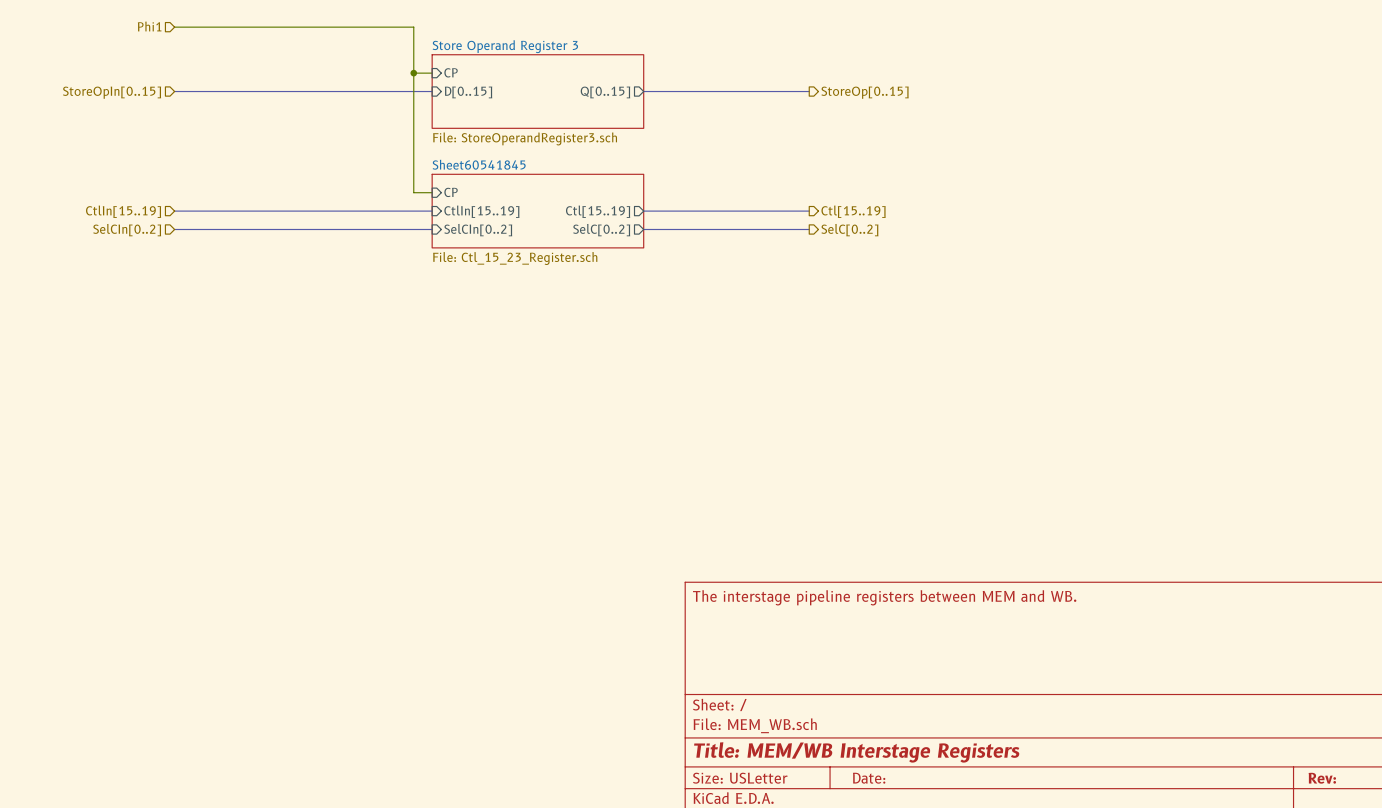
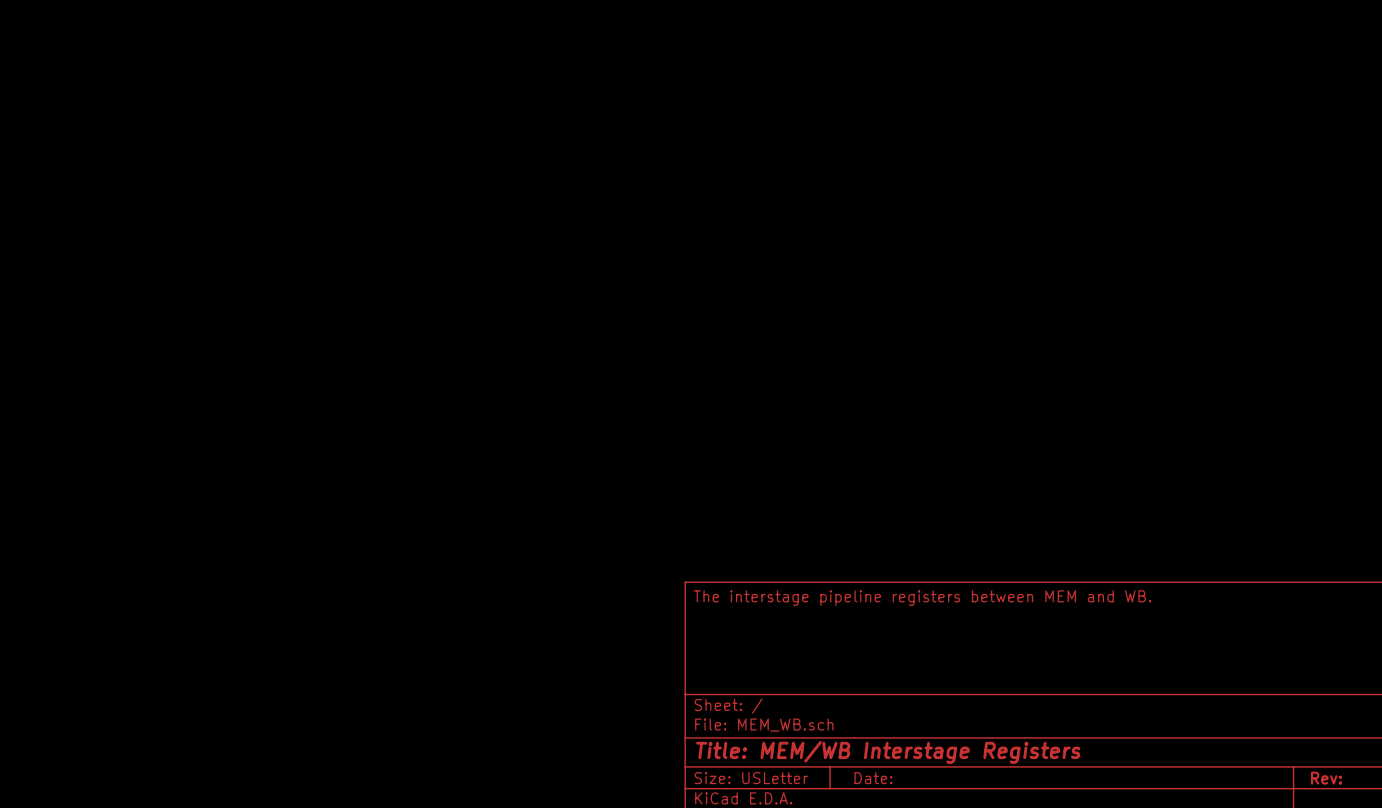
hierarchical label: Phi1 (149, 26) -> none
wire: (174, 27) (413, 27) (413, 192) (432, 192) -> none
sheet pin: CP (451, 72) -> none
wire: (413, 73) (432, 73) -> none
junction: (413, 73) -> none
bus: (174, 91) (432, 91) -> none
sheet Store Operand Register 3: File: StoreOperandRegister3.sch (537, 91) -> none
bus: (643, 91) (809, 91) -> none
hierarchical label: StoreOpIn[0..15] (112, 92) -> none
sheet pin: D[0..15] (468, 92) -> none
sheet pin: Q[0..15] (605, 92) -> none
hierarchical label: StoreOp[0..15] (865, 92) -> none
sheet pin: CP (451, 192) -> none
hierarchical label: CtlIn[15..19] (123, 211) -> none
bus: (174, 211) (432, 211) -> none
sheet pin: CtlIn[15..19] (481, 211) -> none
sheet Sheet60541845: File: Ctl_15_23_Register.sch (537, 211) -> none
sheet pin: Ctl[15..19] (598, 211) -> none
bus: (643, 211) (809, 211) -> none
hierarchical label: Ctl[15..19] (853, 211) -> none
bus: (174, 229) (432, 229) -> none
bus: (643, 229) (809, 229) -> none
hierarchical label: SelCIn[0..2] (127, 230) -> none
sheet pin: SelCIn[0..2] (478, 230) -> none
sheet pin: SelC[0..2] (601, 230) -> none
hierarchical label: SelC[0..2] (849, 230) -> none

